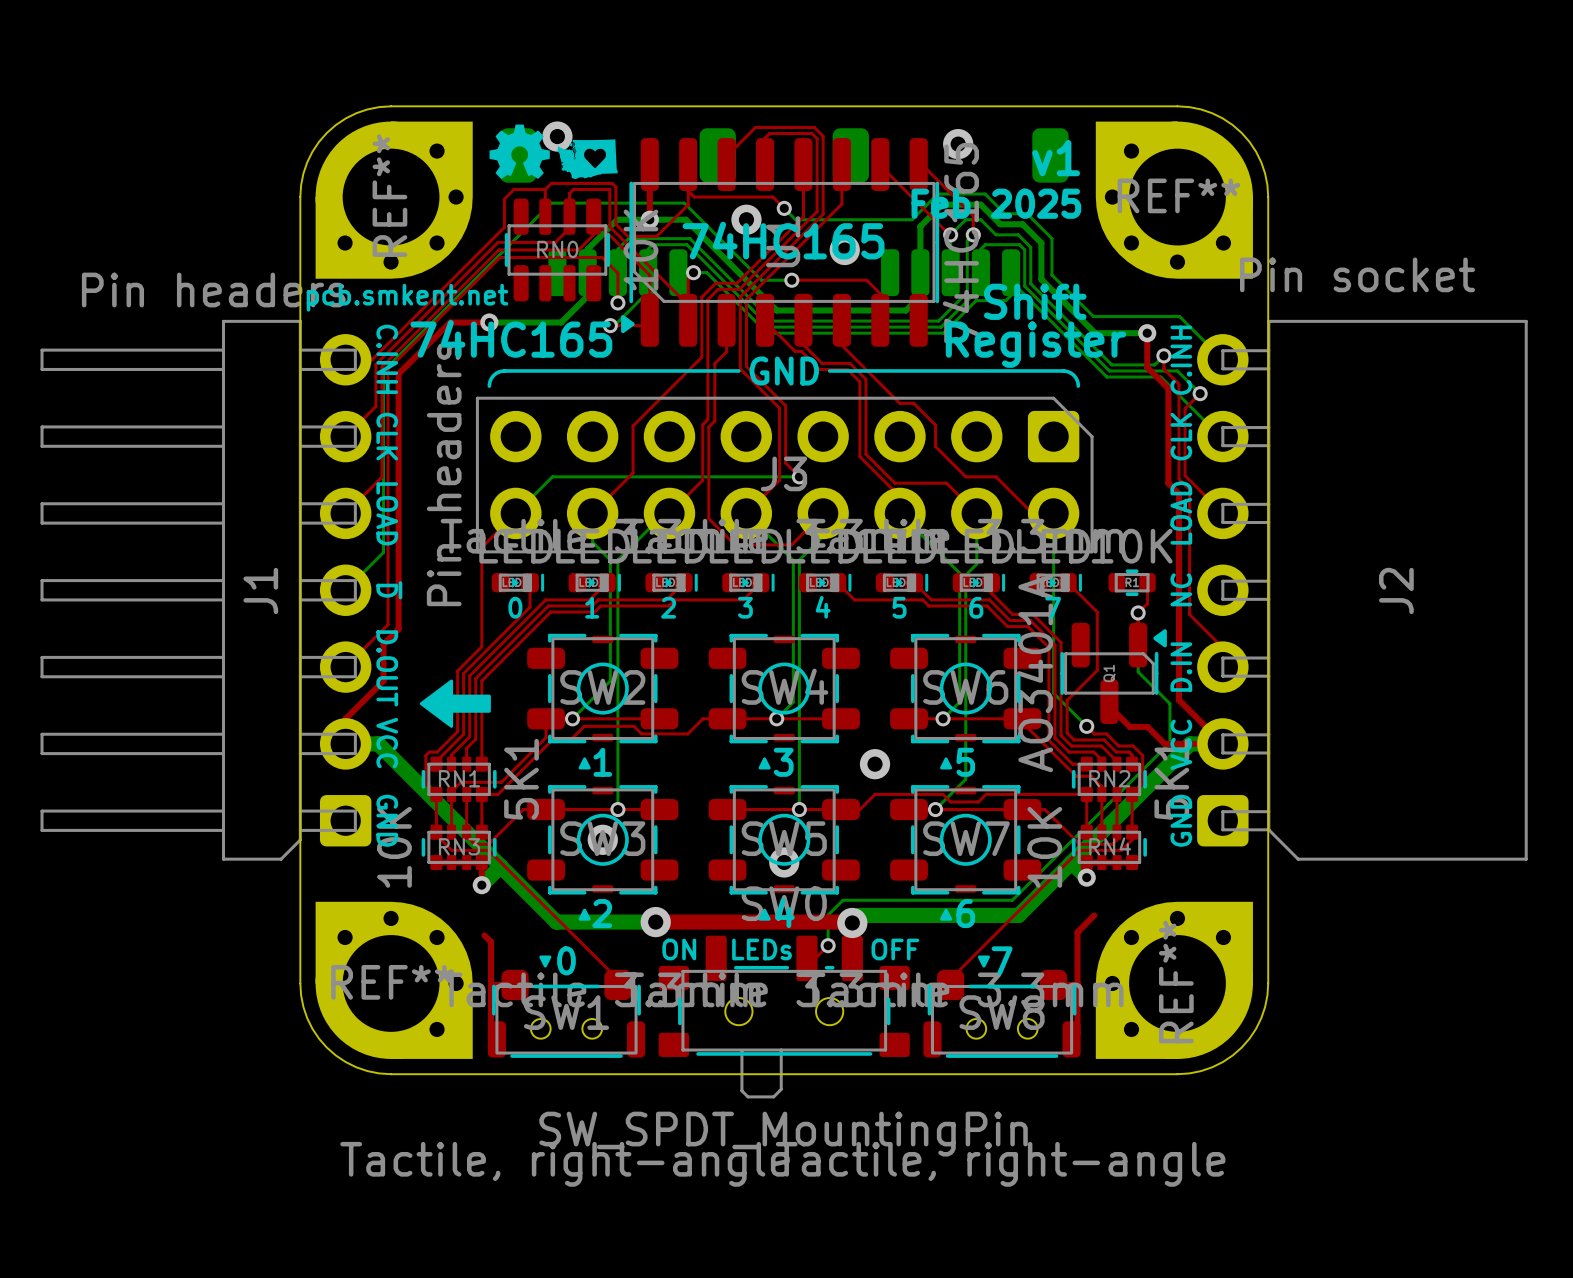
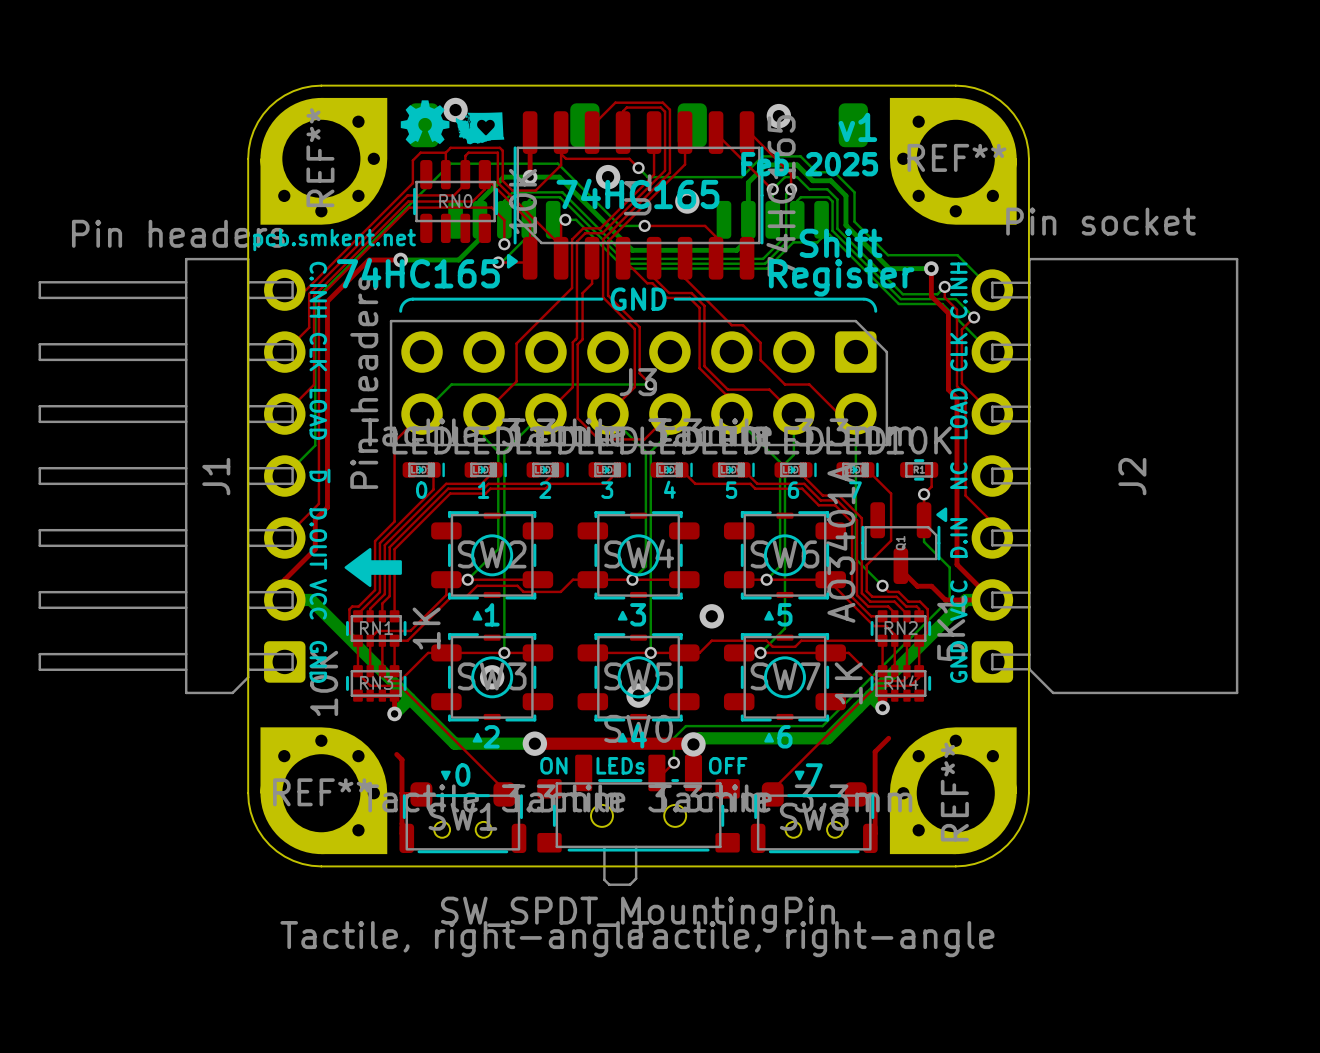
RN1 value: 5K1 (521, 779) -> 1K (426, 628)
RN4 value: 10K (1044, 847) -> 1K (848, 683)

